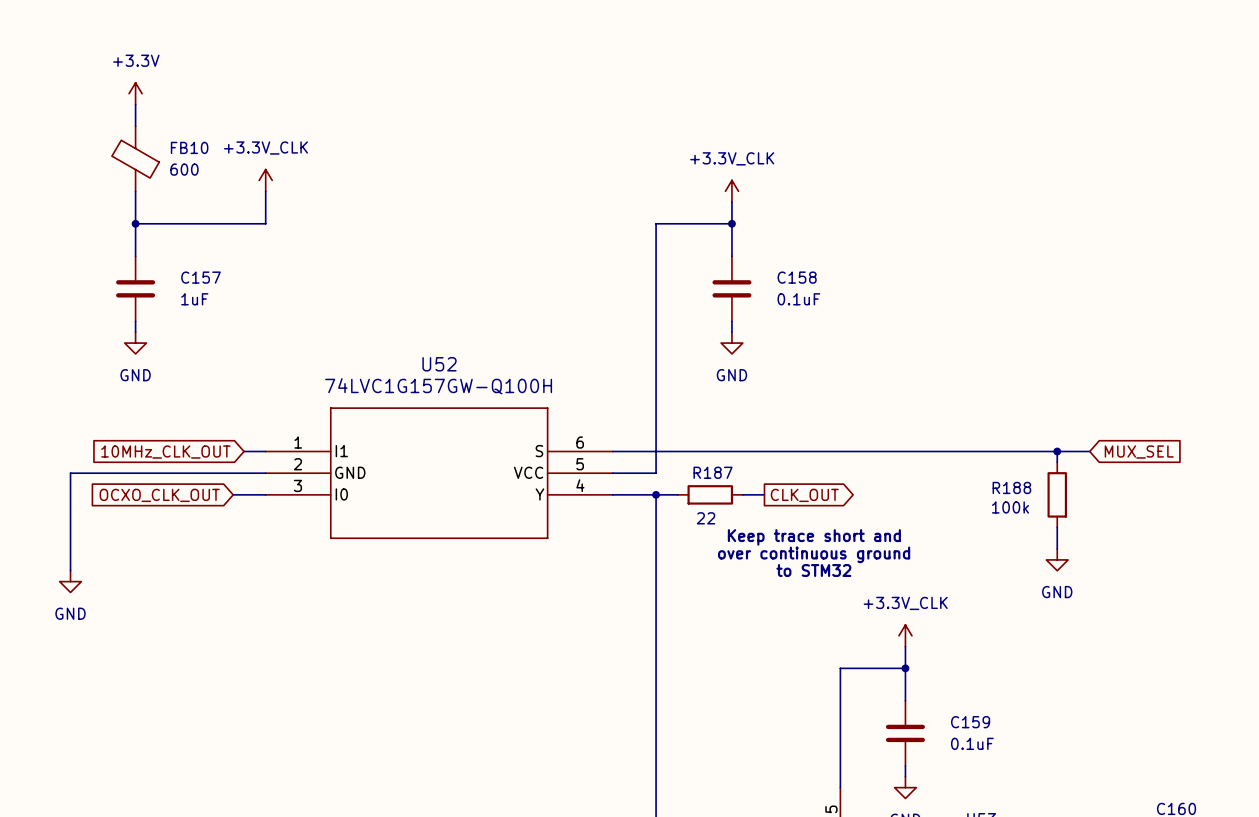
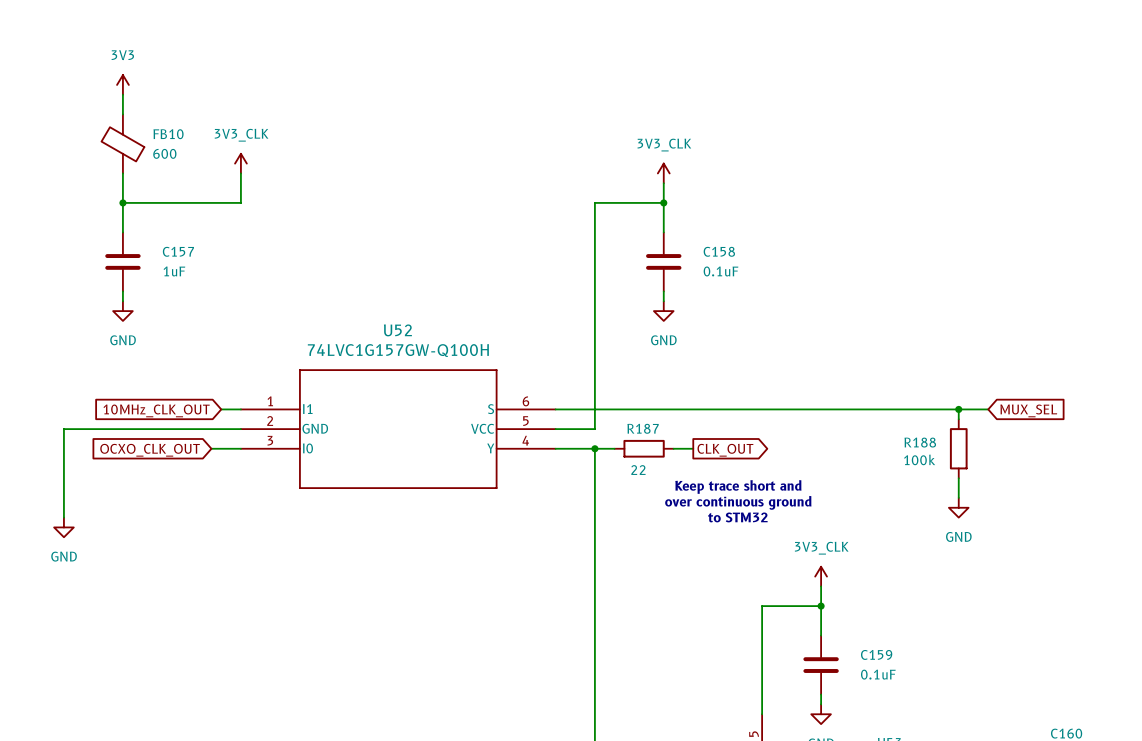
power symbol: +3.3V (135, 93) -> 3V3 (122, 84)
power symbol: +3.3V_CLK (265, 180) -> 3V3_CLK (240, 163)
power symbol: +3.3V_CLK (731, 191) -> 3V3_CLK (663, 173)
power symbol: +3.3V_CLK (905, 635) -> 3V3_CLK (821, 576)

